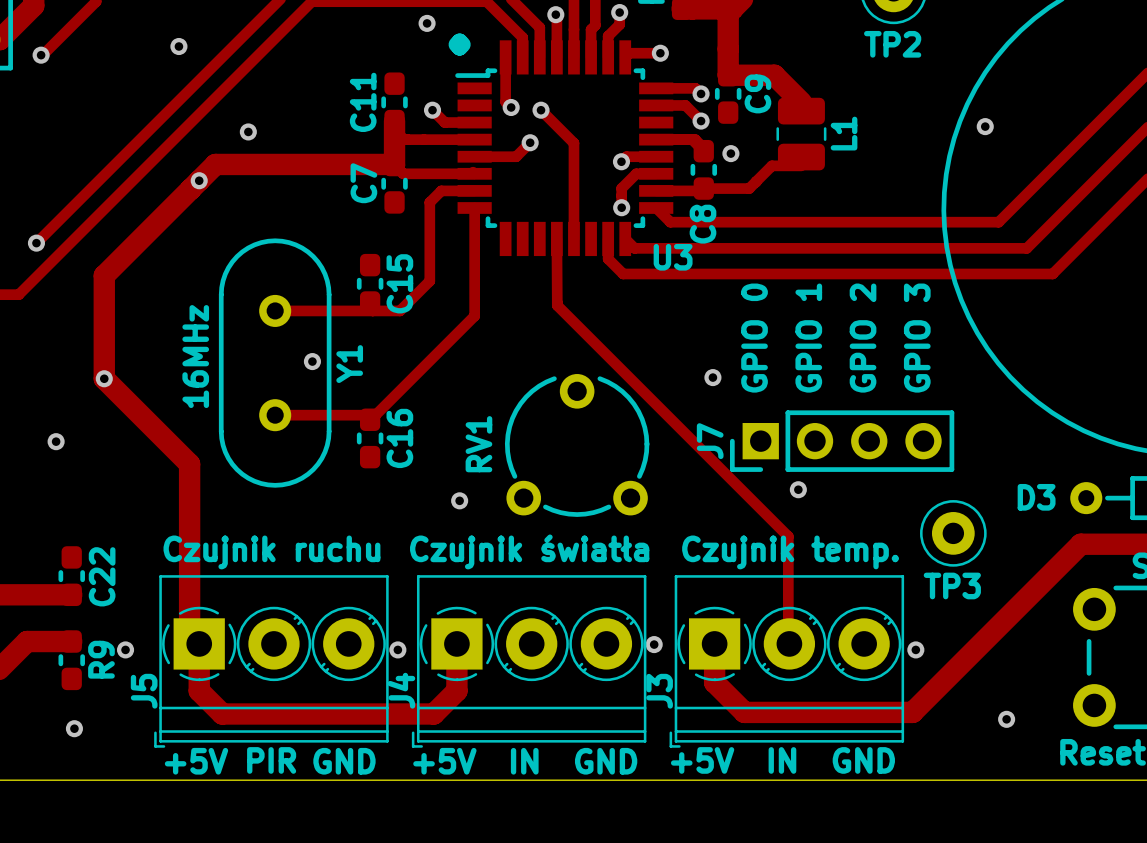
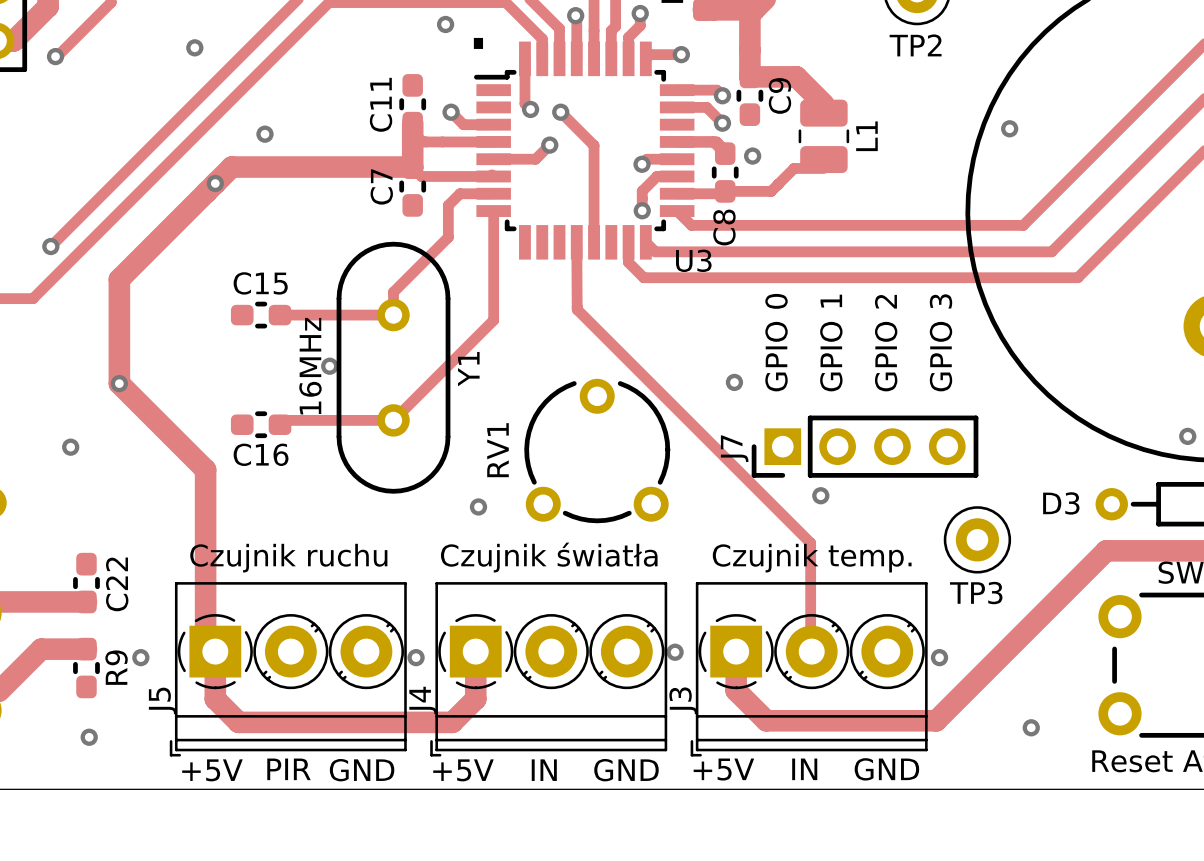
track: (429, 234) (429, 281) (399, 310) (375, 310) -> (448, 237) (393, 292) (393, 315)
C15 rotation: 0° (370, 283) -> 90° clockwise (261, 315)
C15 position: (370, 283) -> (261, 315)
C15 name position: C15 (399, 283) -> C15 (260, 283)
text position: 16MHz (195, 356) -> 16MHz (310, 366)
Y1 position: (275, 363) -> (393, 367)
C16 rotation: 0° (370, 438) -> 90° clockwise (261, 424)
C16 position: (370, 438) -> (261, 424)

